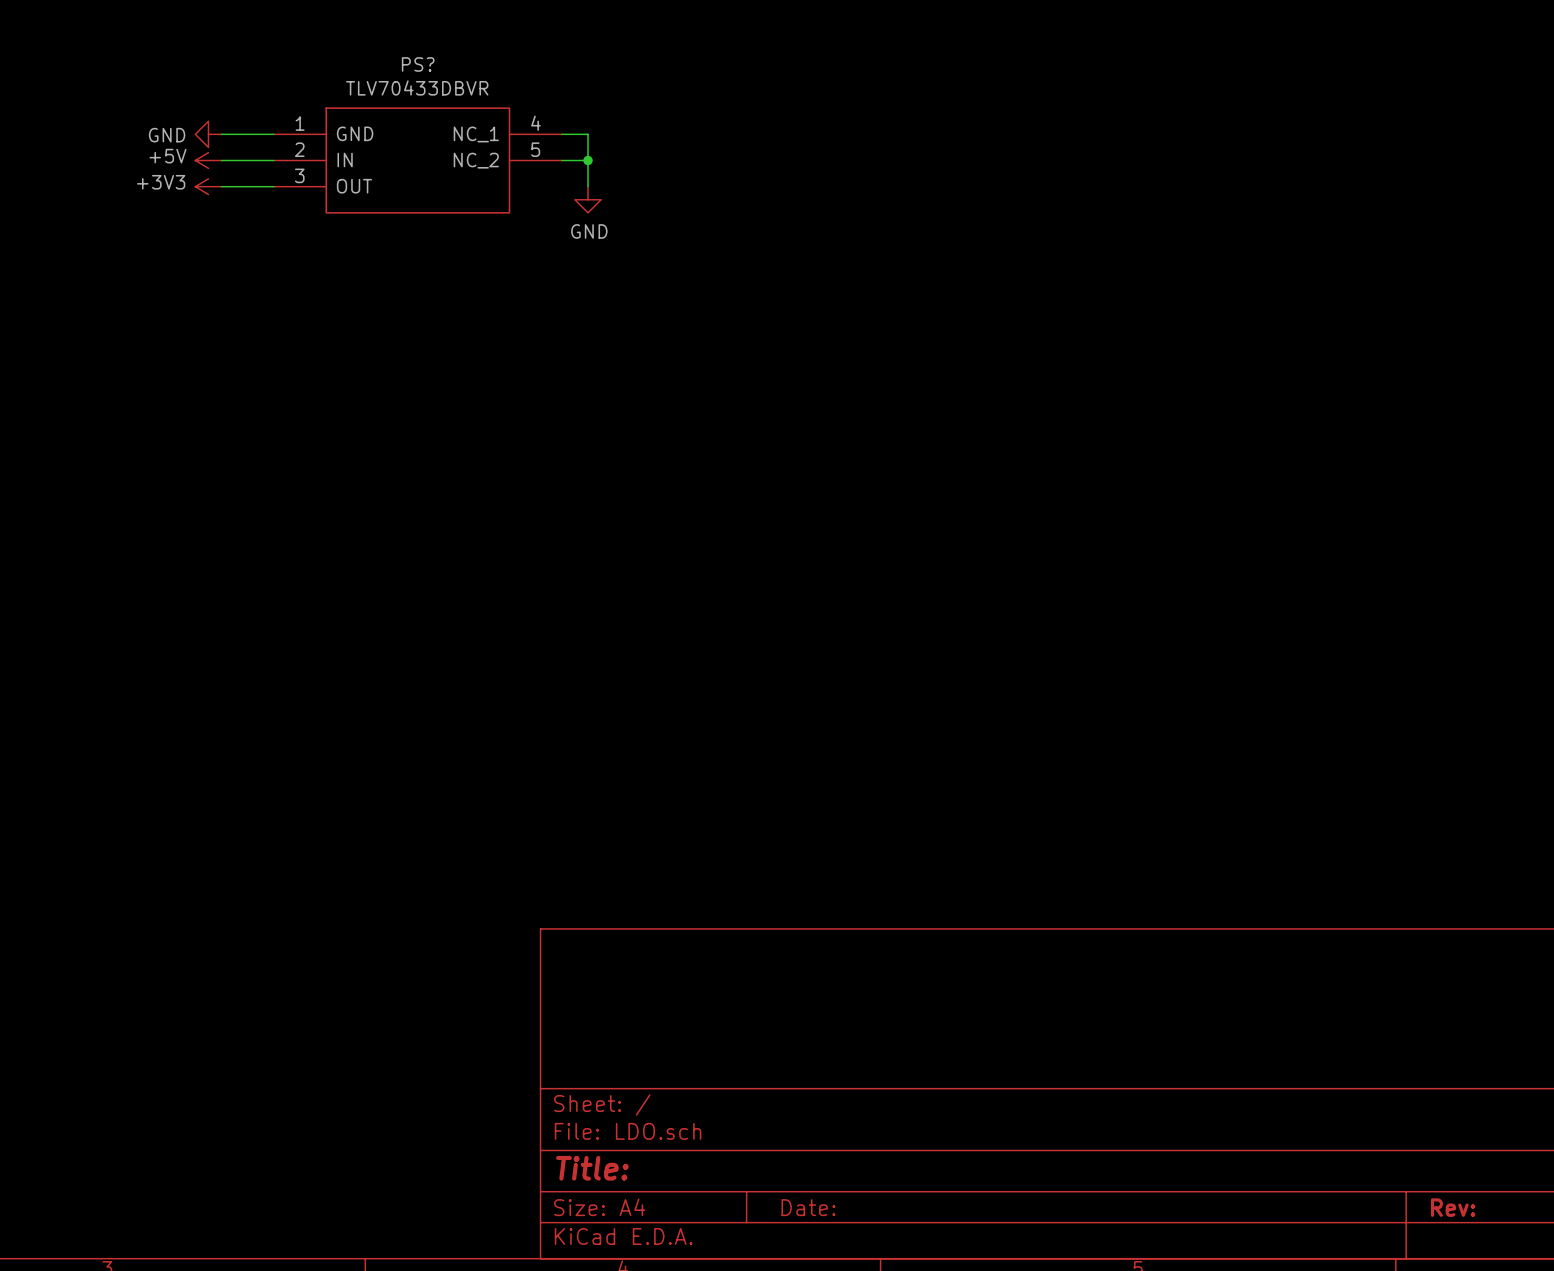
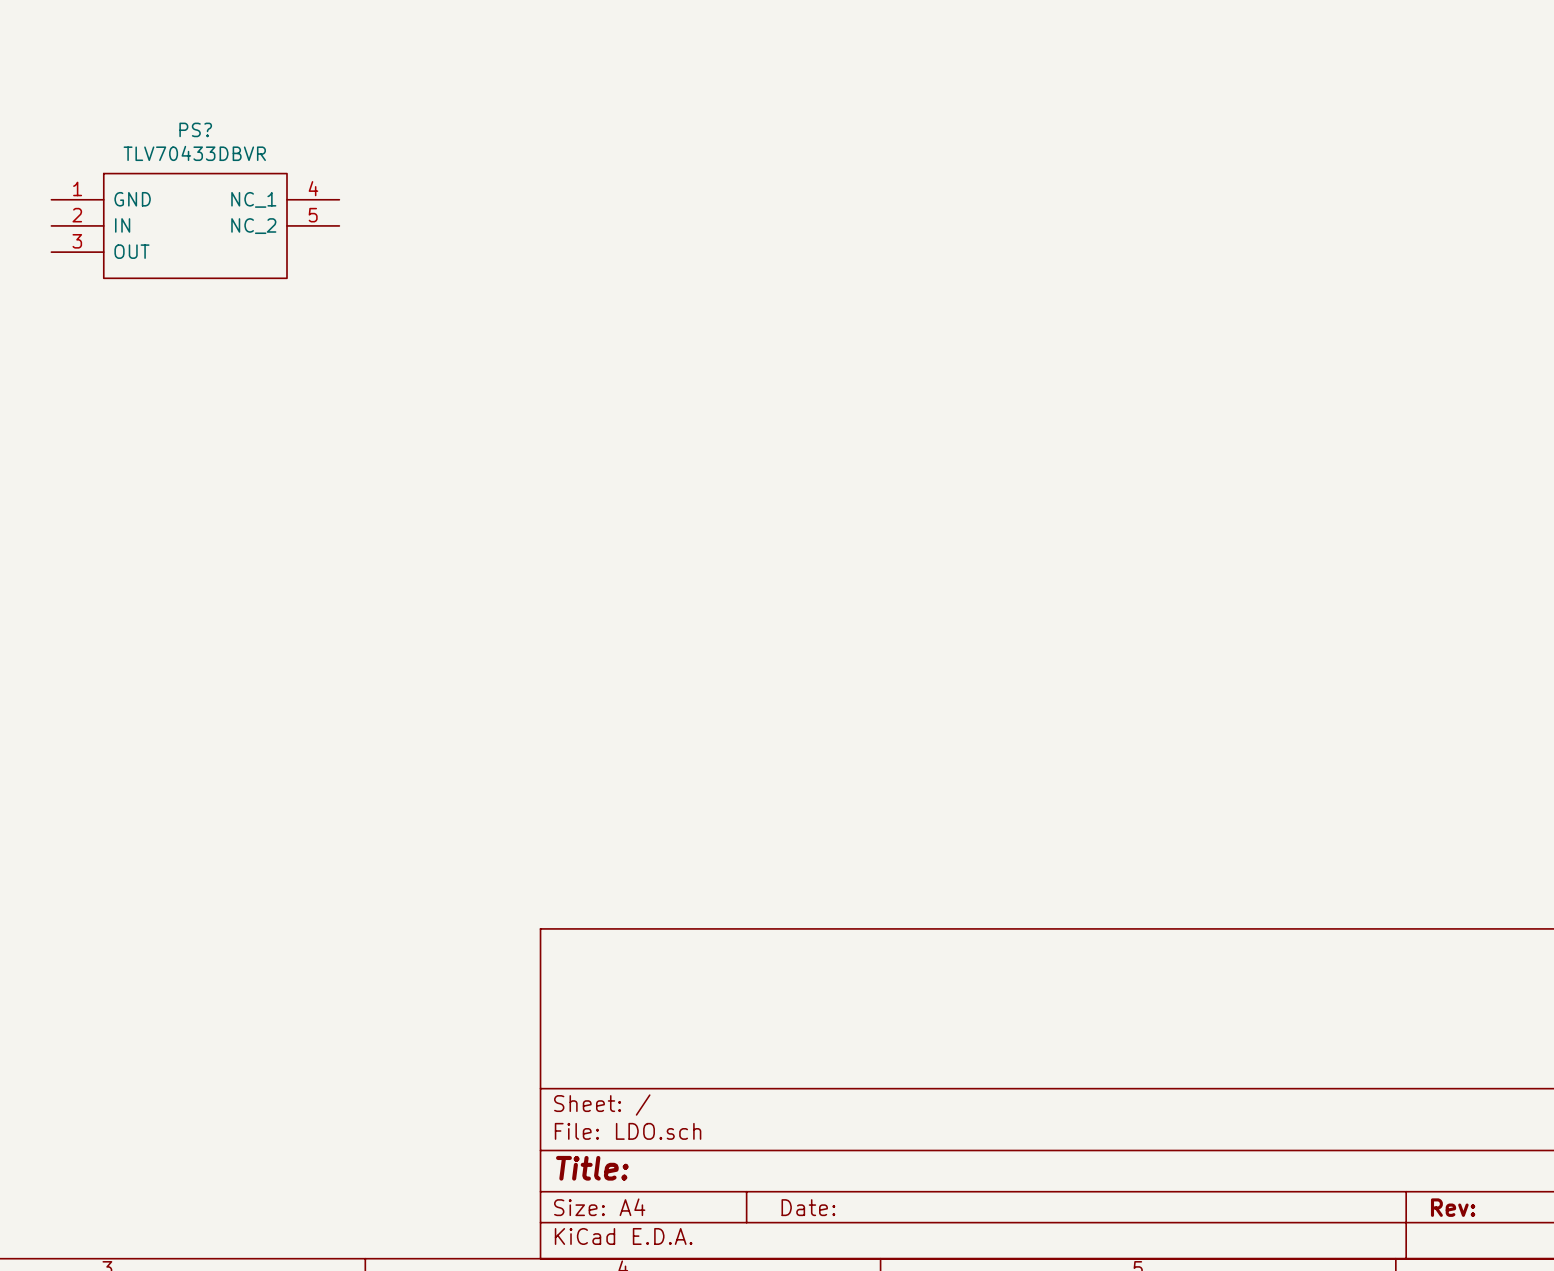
power symbol: GND (208, 134) -> none
wire: (221, 134) (273, 134) -> none
wire: (561, 134) (588, 134) (588, 186) -> none
power symbol: +5V (208, 160) -> none
wire: (221, 160) (273, 160) -> none
PS? position: (417, 160) -> (195, 225)
wire: (561, 160) (588, 160) -> none
junction: (588, 160) -> none
power symbol: +3V3 (208, 186) -> none
wire: (221, 186) (273, 186) -> none
power symbol: GND (588, 199) -> none

